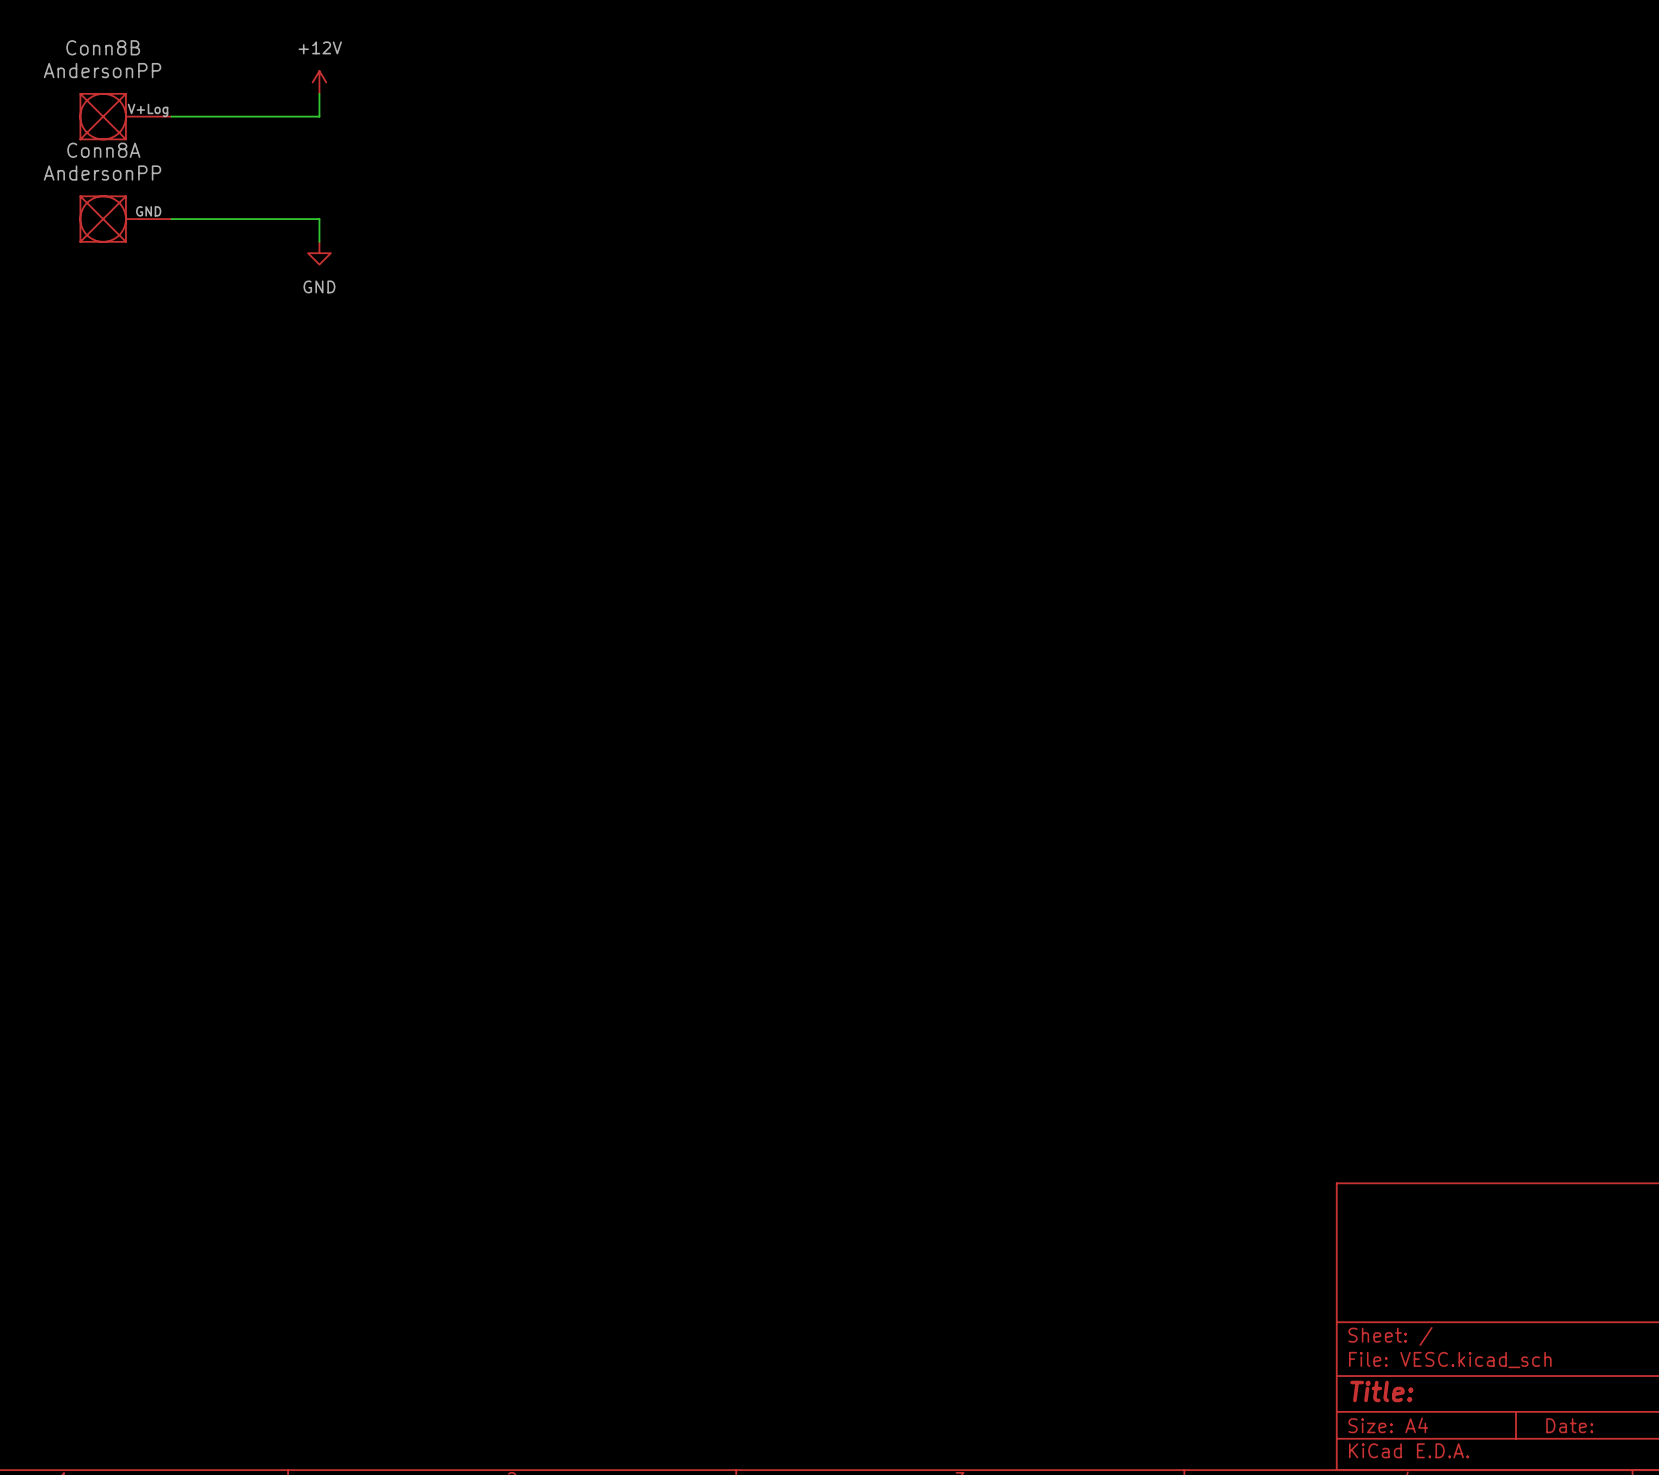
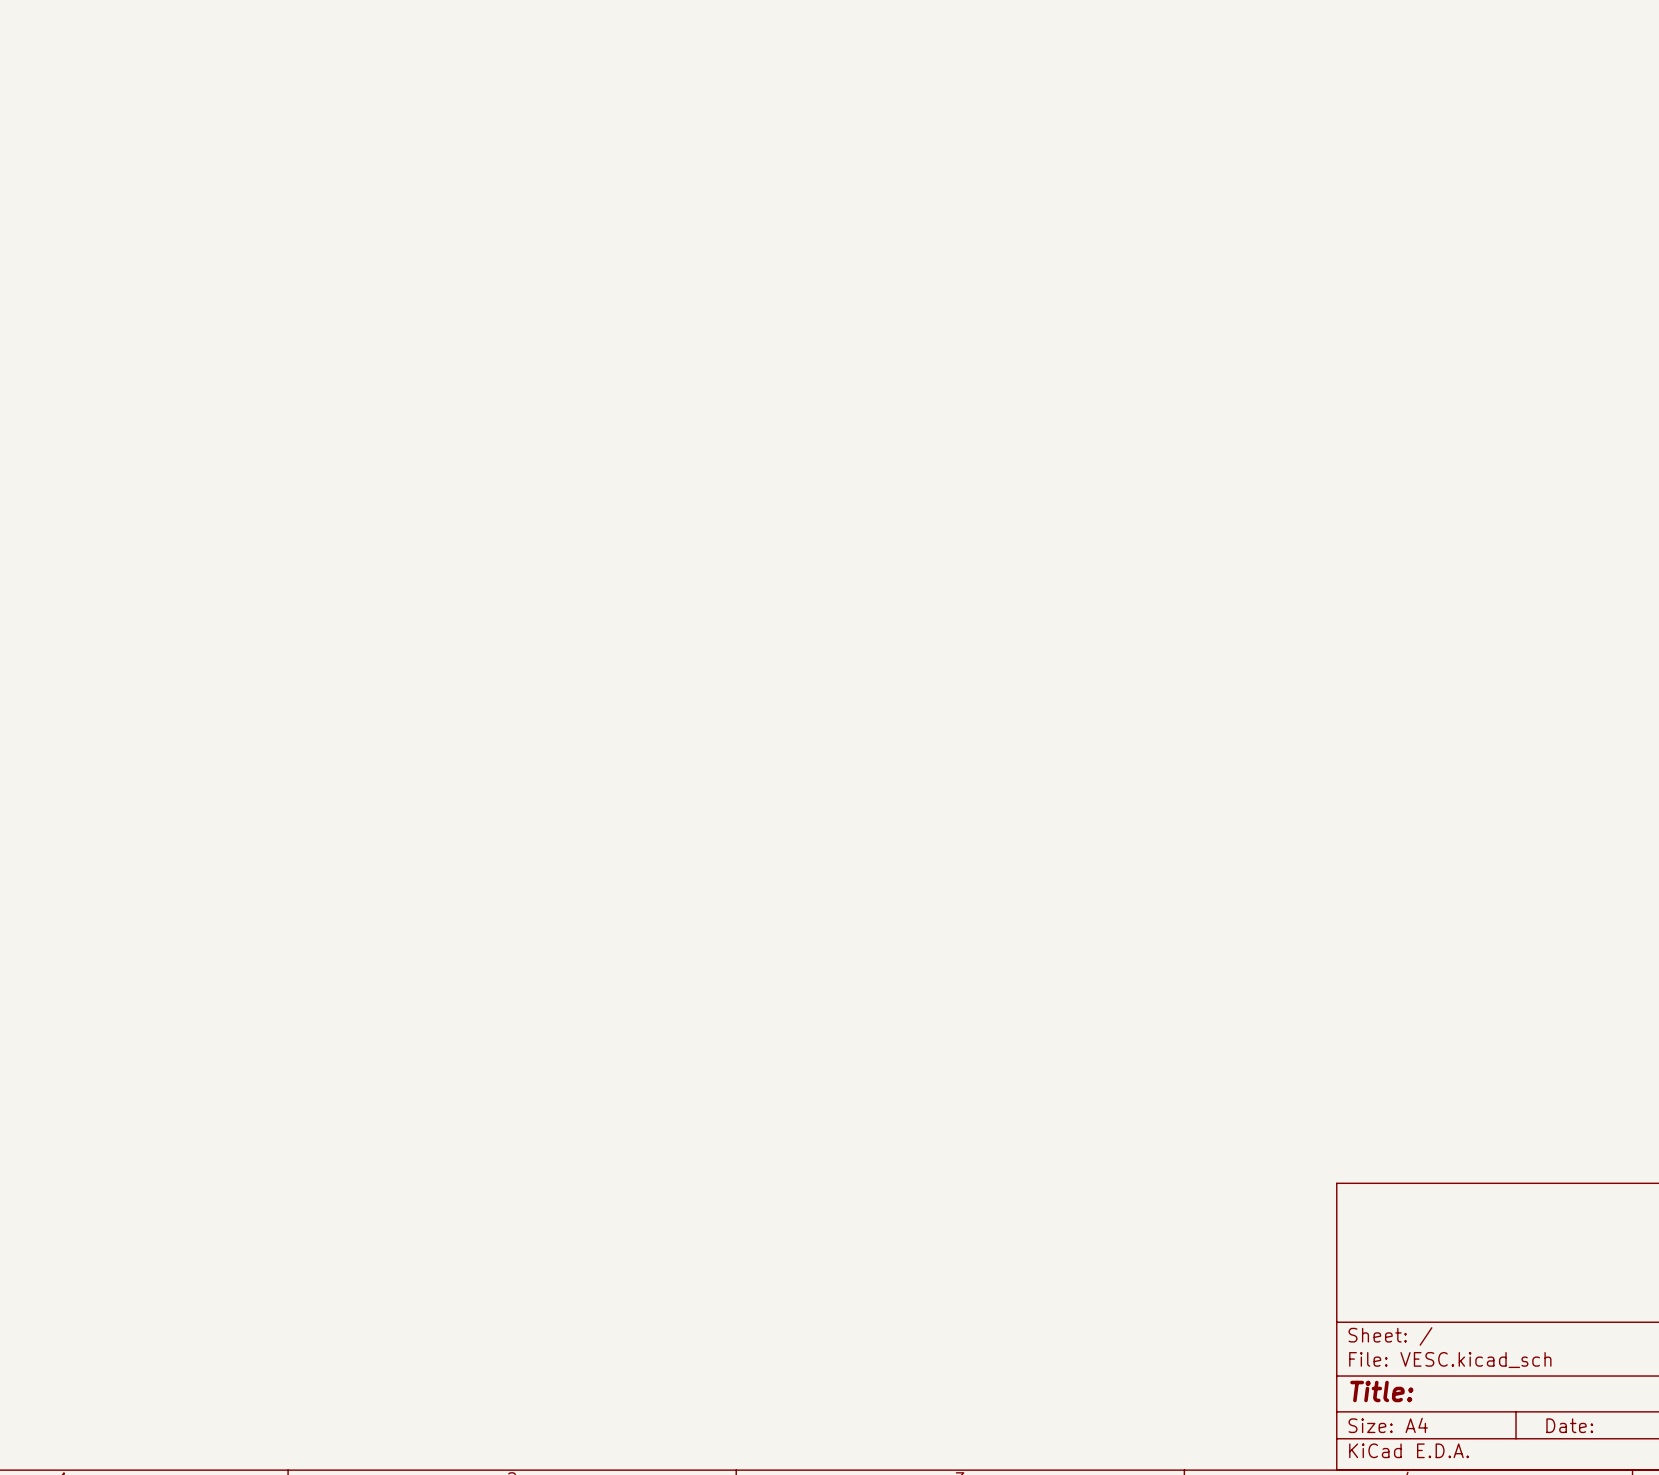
power symbol: +12V (319, 82) -> none
wire: (319, 93) (319, 116) (171, 116) -> none
Conn8B: AndersonPP (125, 116) -> none
Conn8A: AndersonPP (125, 219) -> none
wire: (171, 219) (319, 219) (319, 241) -> none
power symbol: GND (319, 253) -> none

